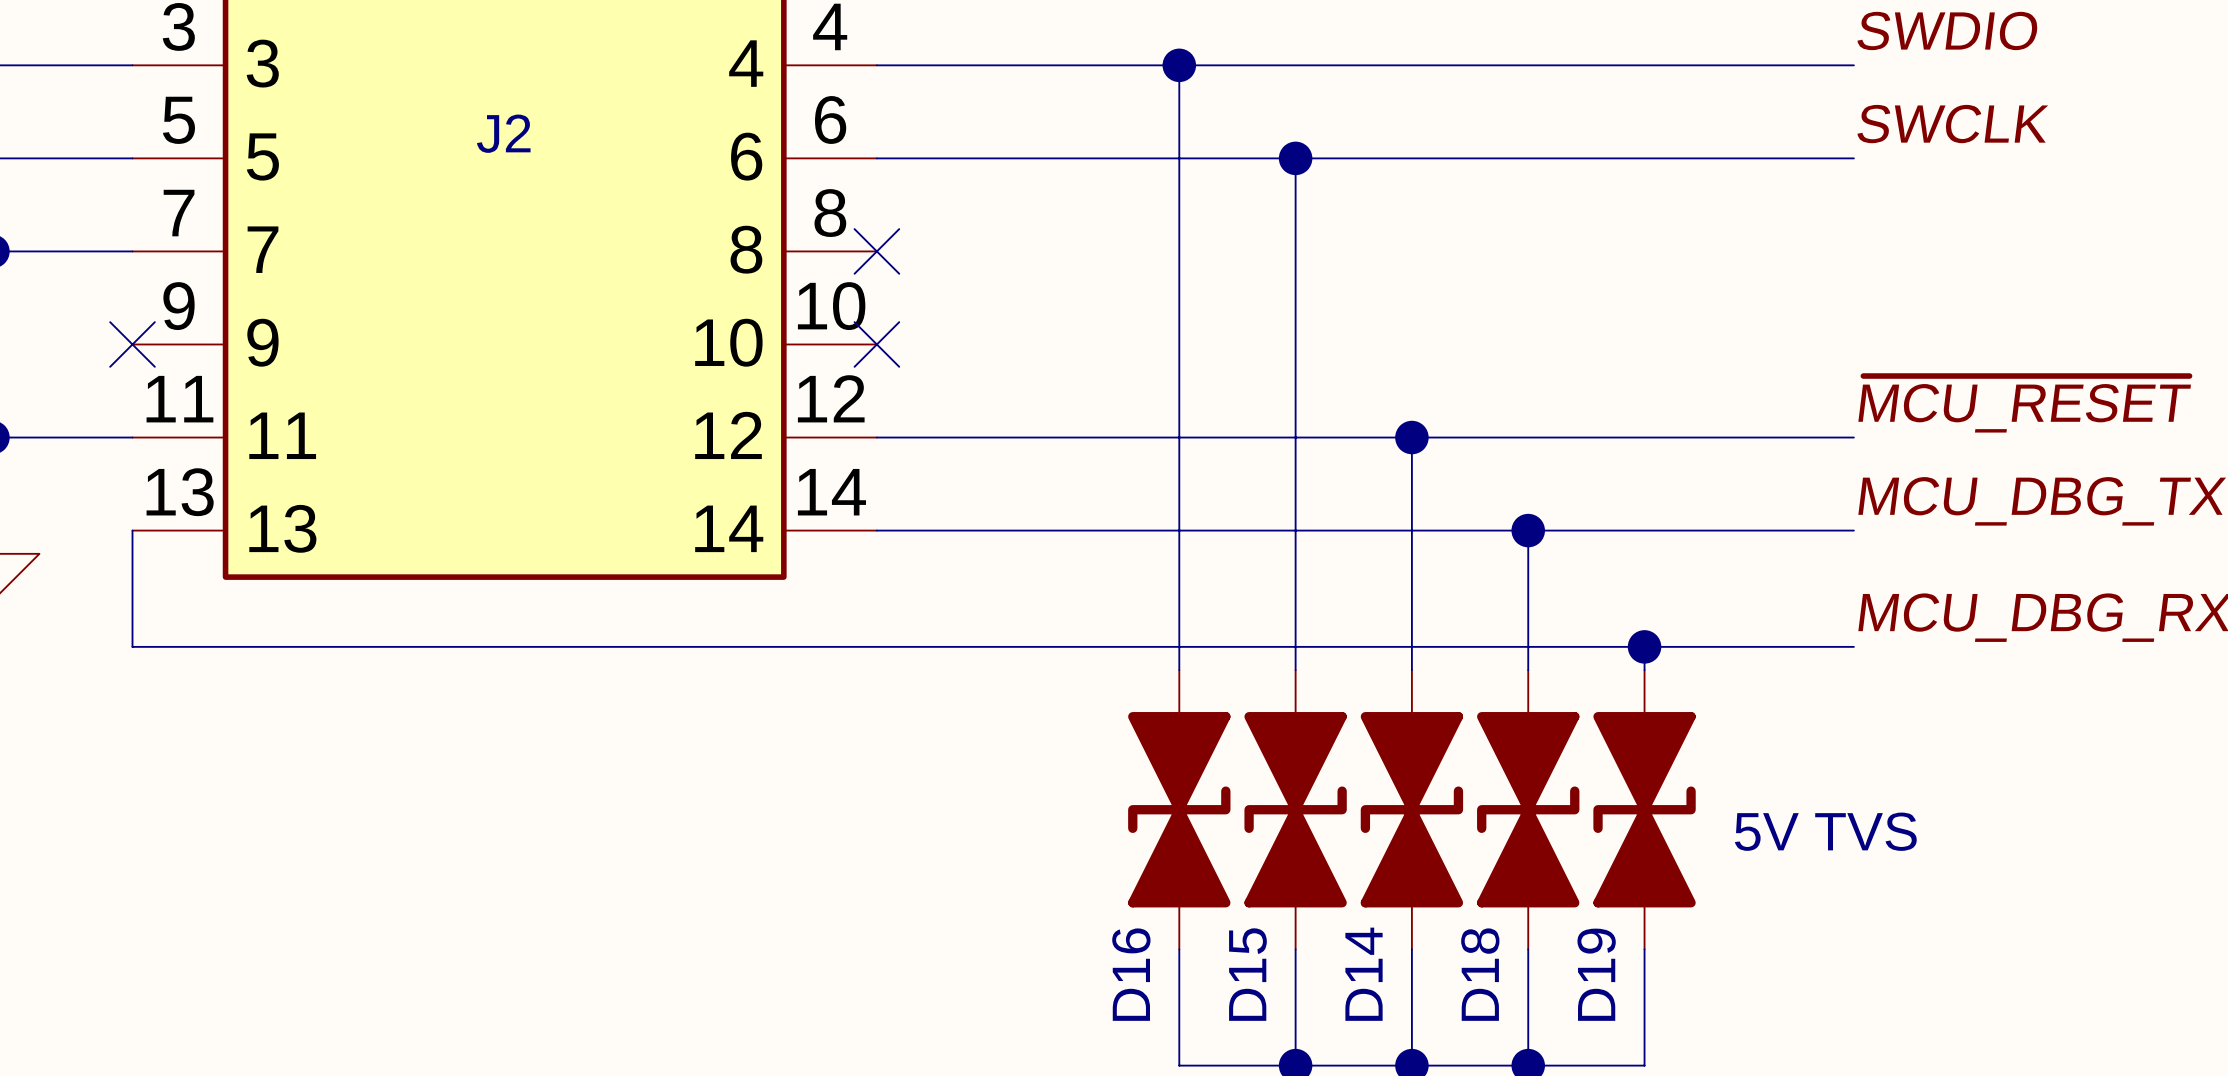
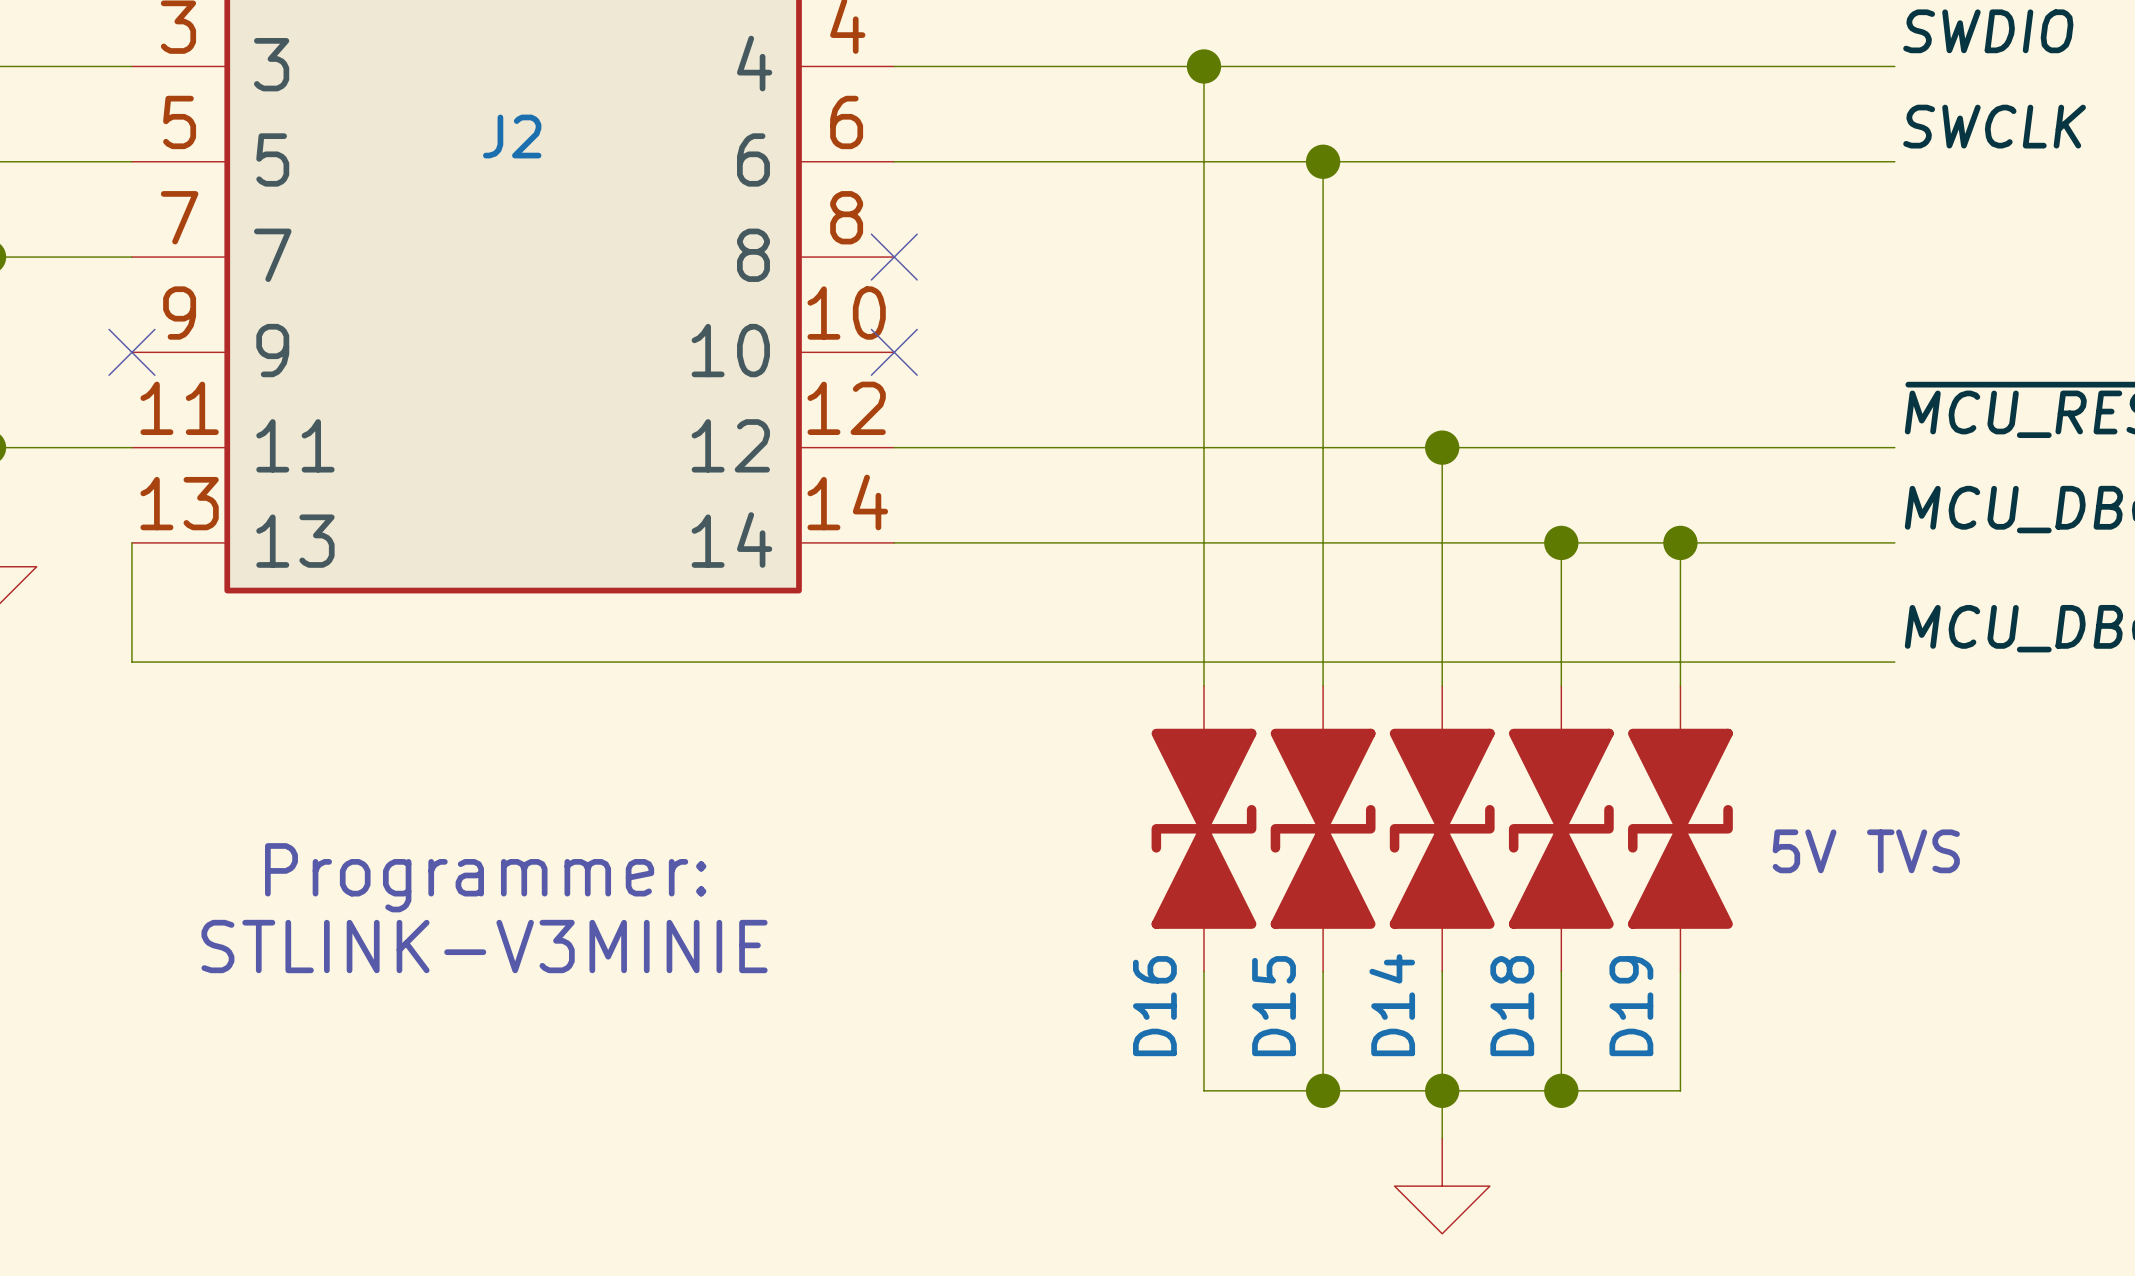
wire: none -> (1680, 542) (1680, 662)
junction position: (1644, 646) -> (1680, 542)
text: none -> Programmer: (485, 877)
text: none -> STLINK-V3MINIE (484, 946)

